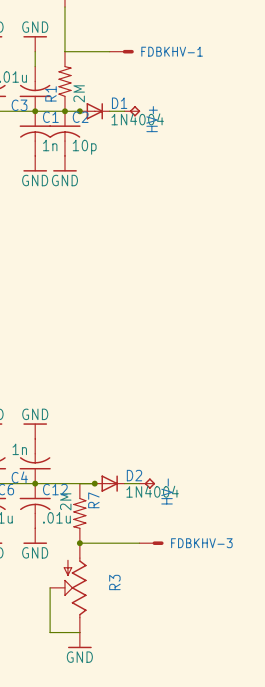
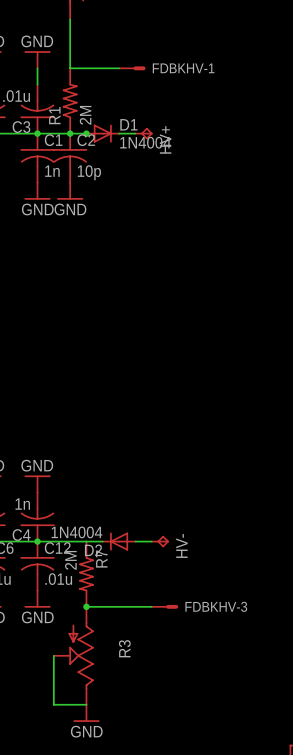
junction: (94, 483) -> none
D2 rotation: 0° (109, 483) -> 180° (119, 541)

